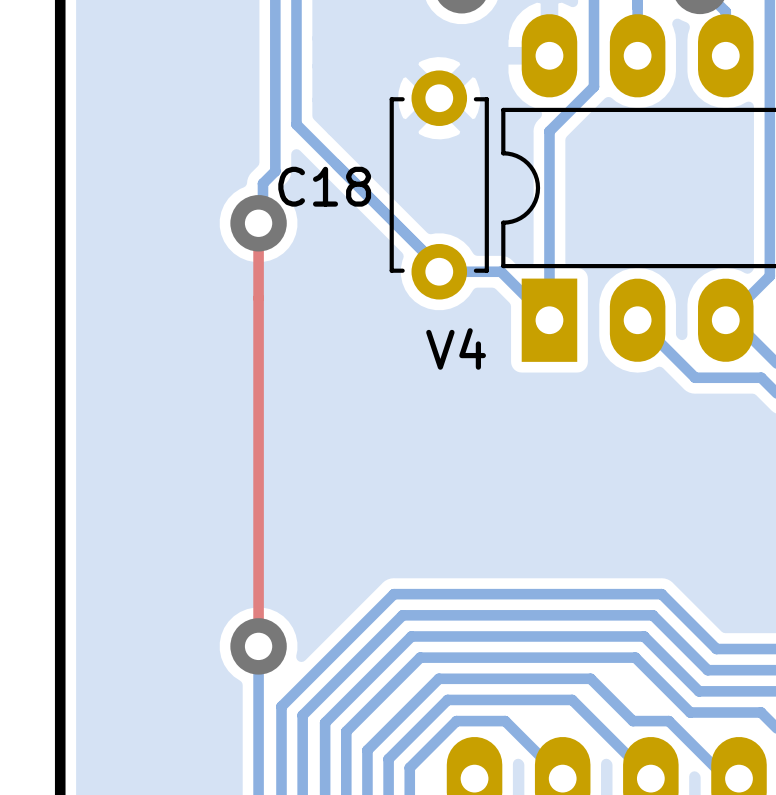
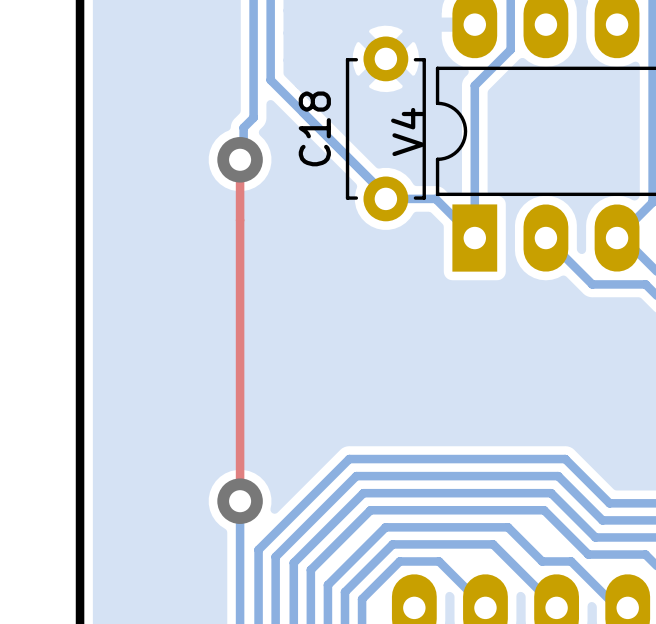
C18 name rotation: 0° (324, 186) -> 90° counterclockwise (314, 128)
V4 name rotation: 0° (456, 348) -> 90° counterclockwise (407, 132)
V4 name position: V4 (456, 348) -> V4 (407, 132)

